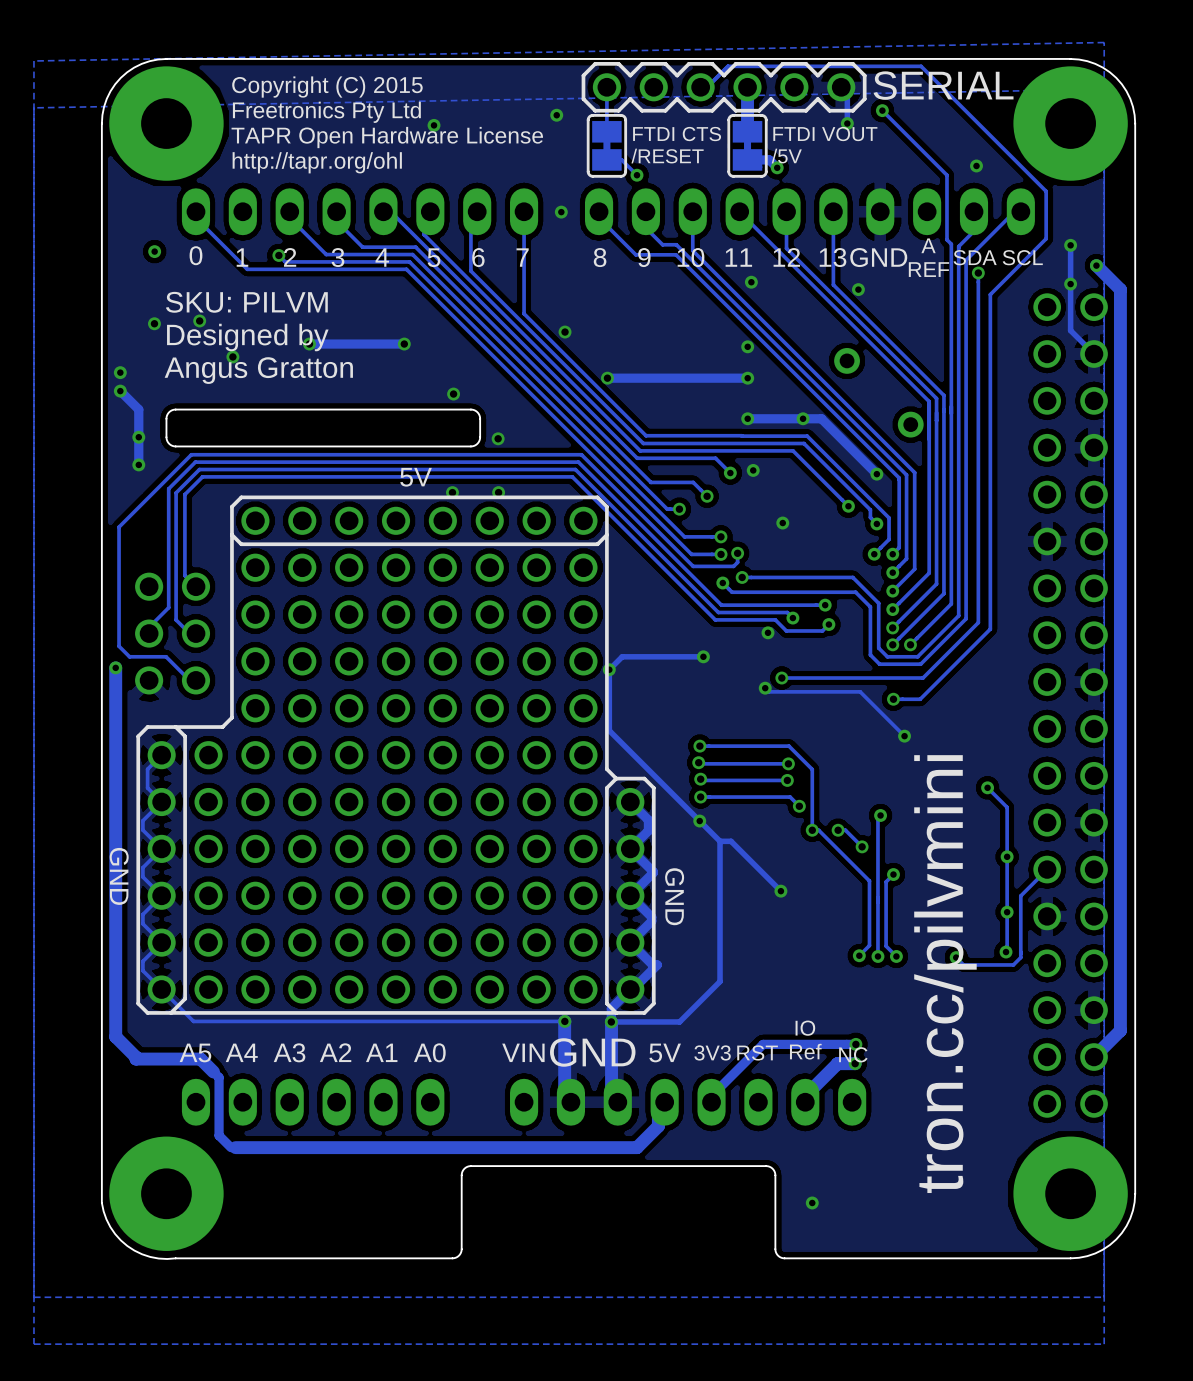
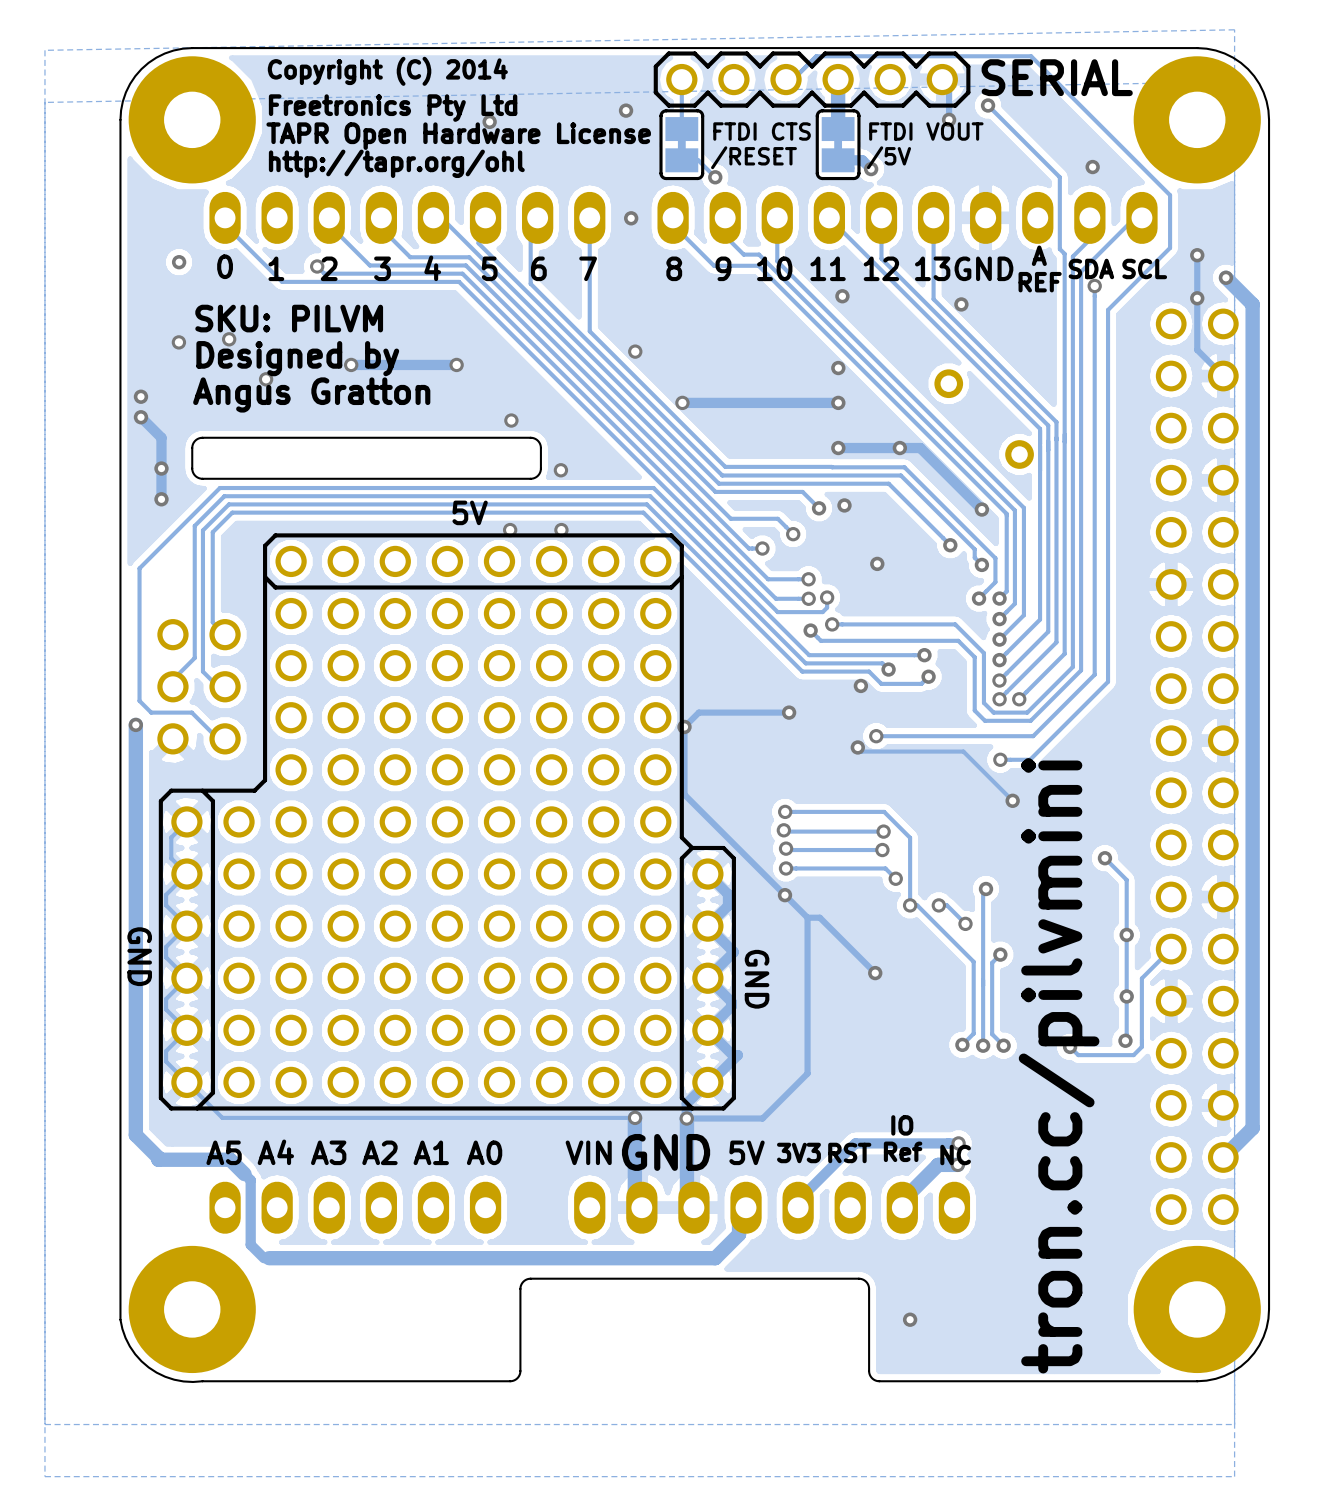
text: Copyright (C) 2015 (327, 87) -> Copyright (C) 2014 (387, 71)

